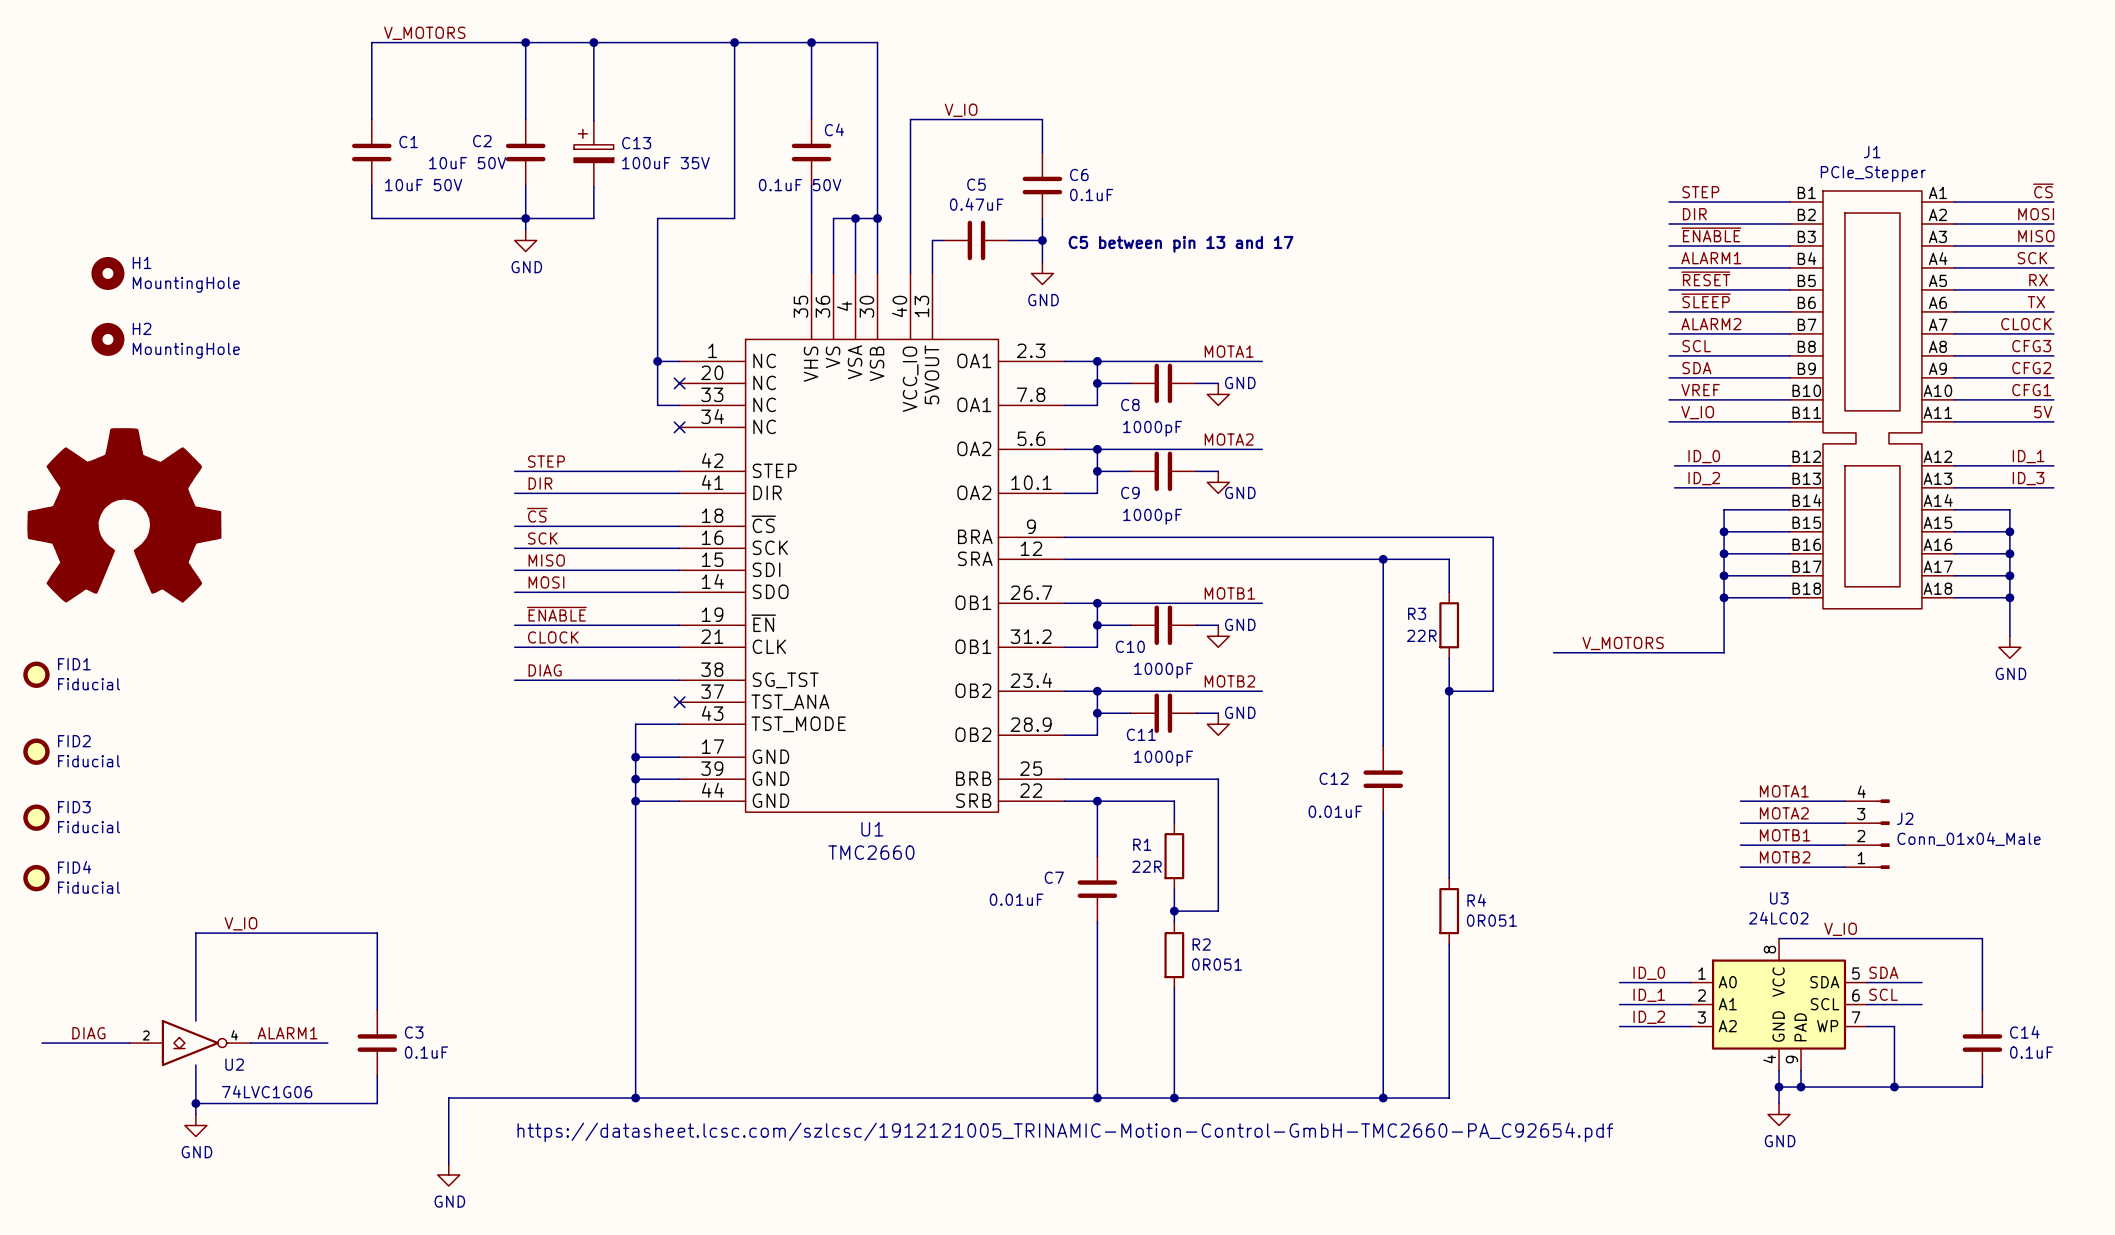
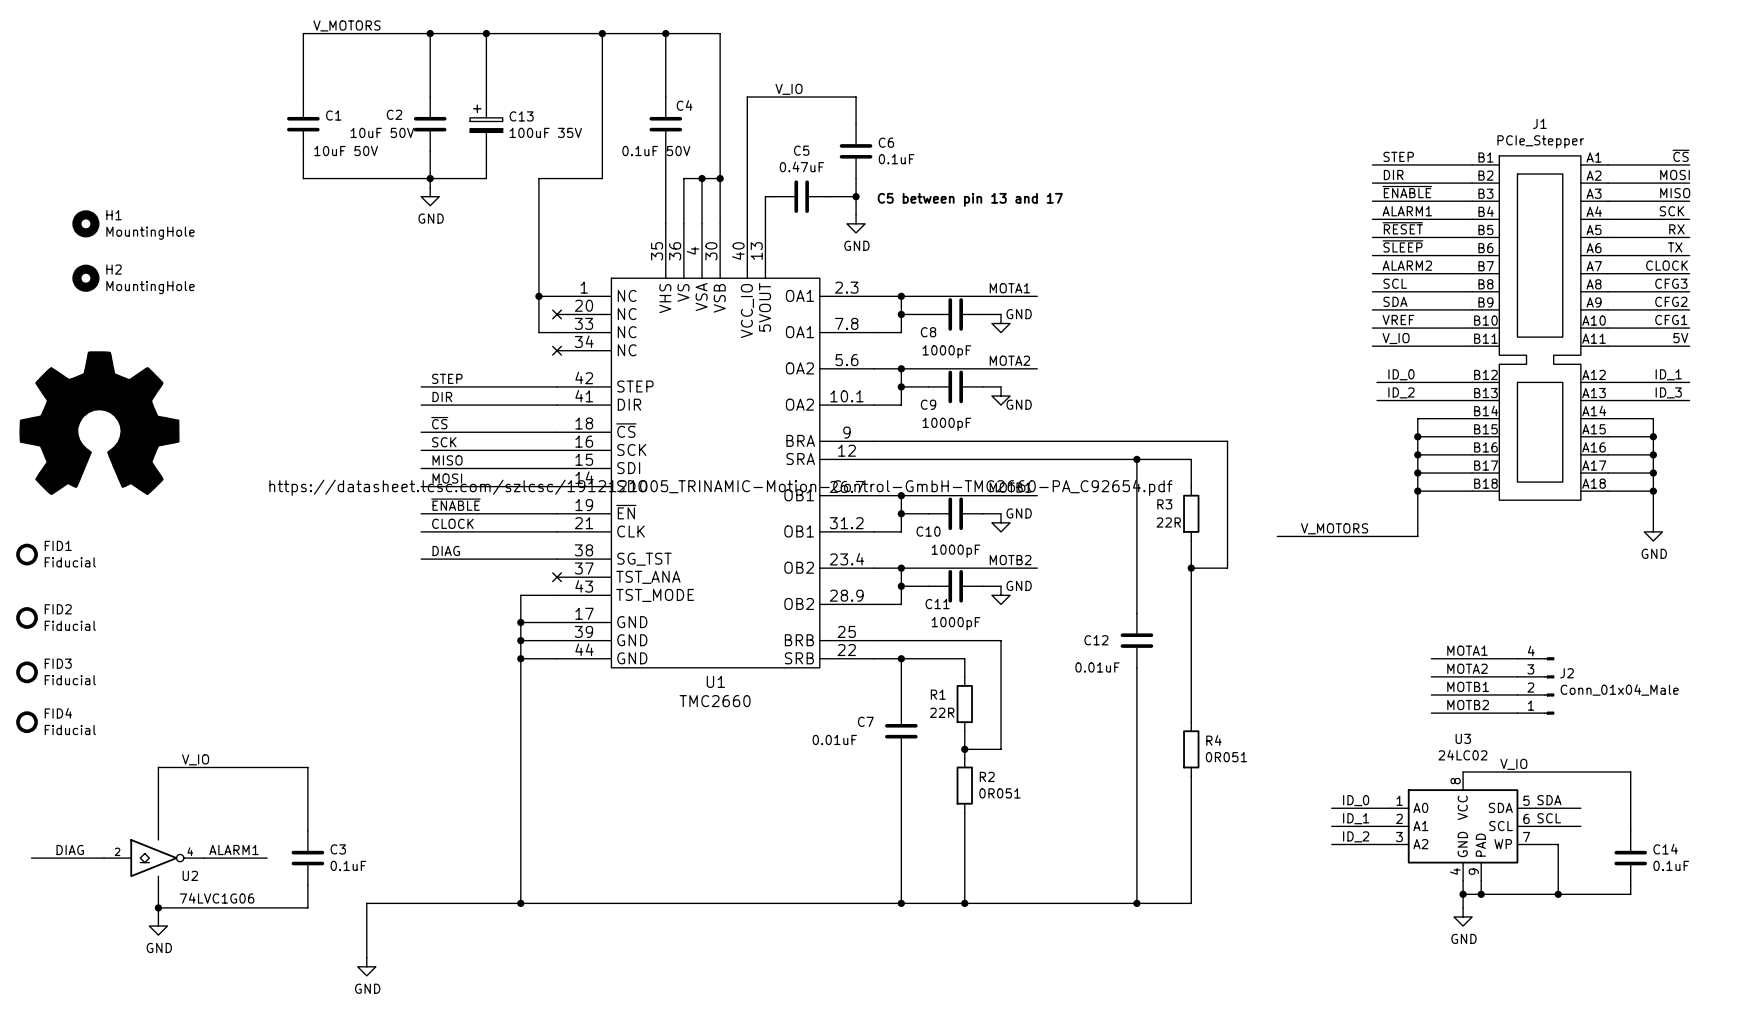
U1 text position: https://datasheet.lcsc.com/szlcsc/1912121005_TRINAMIC-Motion-Control-GmbH-TMC2660-PA_C92654.pdf (1065, 1132) -> https://datasheet.lcsc.com/szlcsc/1912121005_TRINAMIC-Motion-Control-GmbH-TMC2660-PA_C92654.pdf (720, 487)

